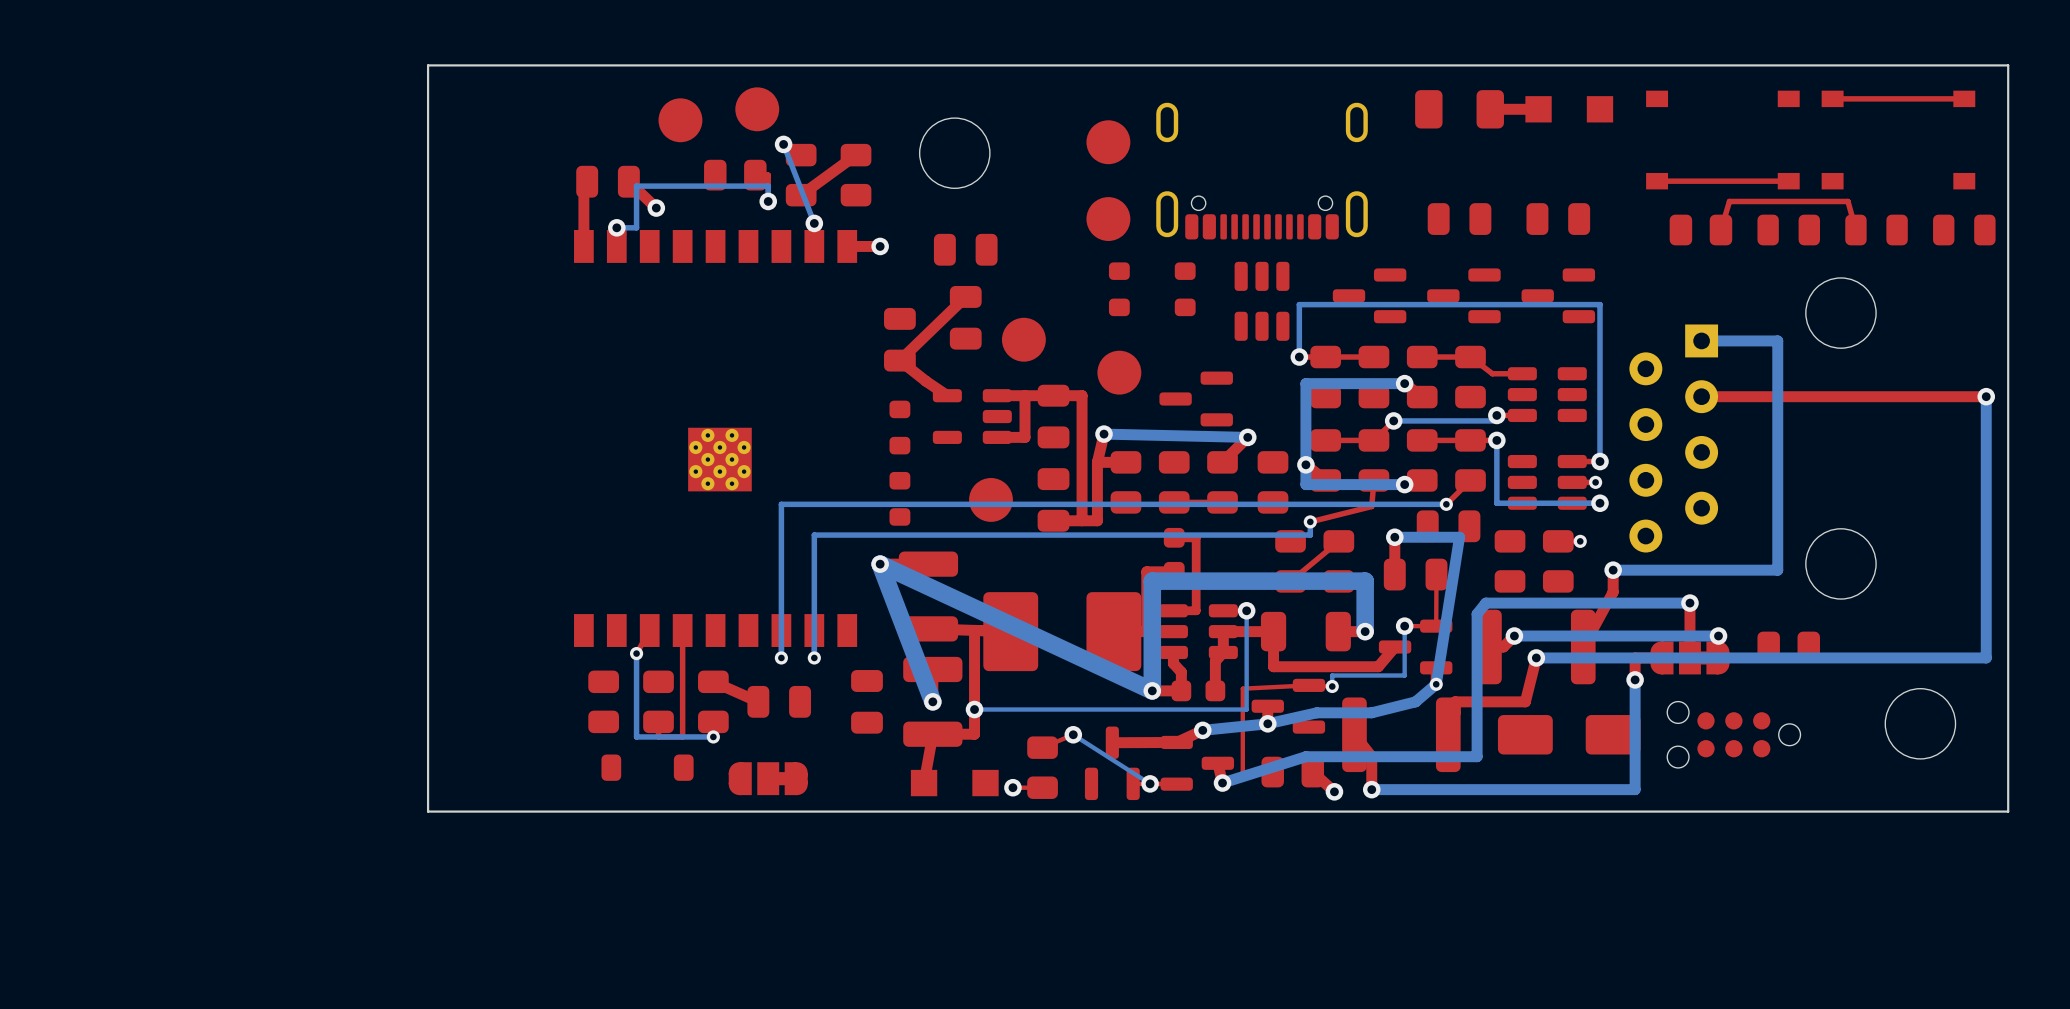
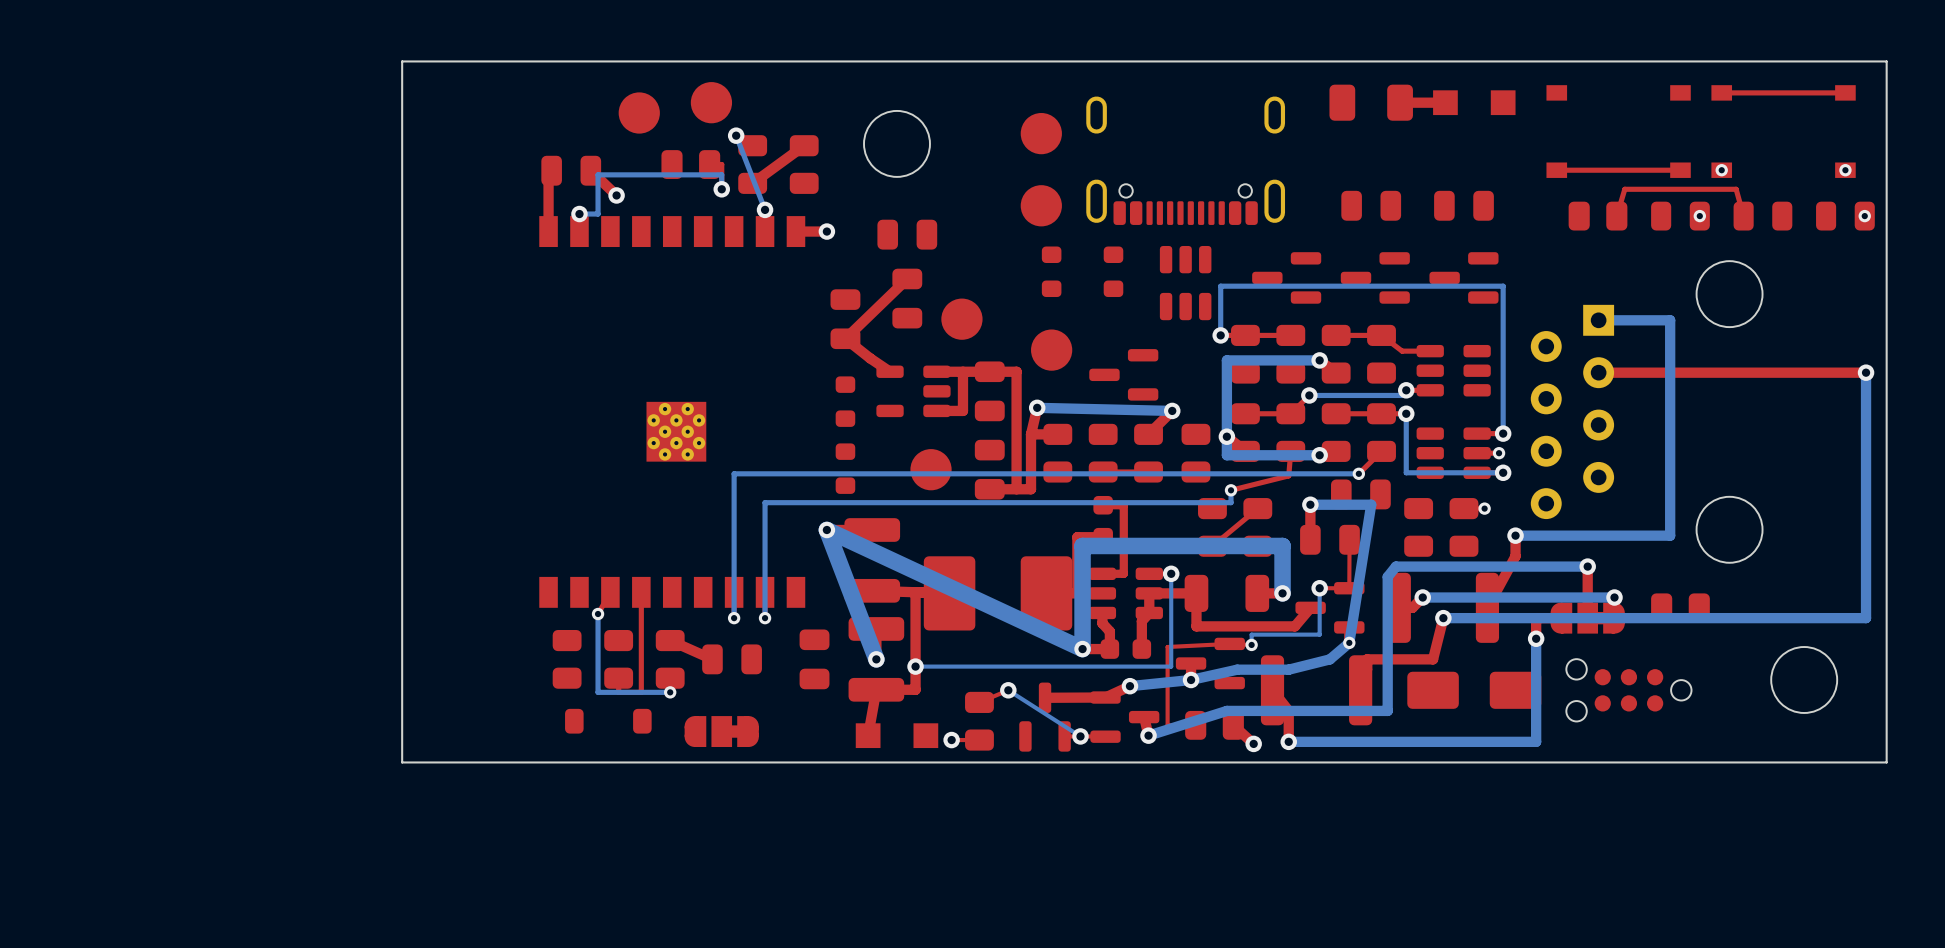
via: none -> (1721, 170)
via: none -> (1845, 170)
via: none -> (1699, 216)
via: none -> (1864, 216)

